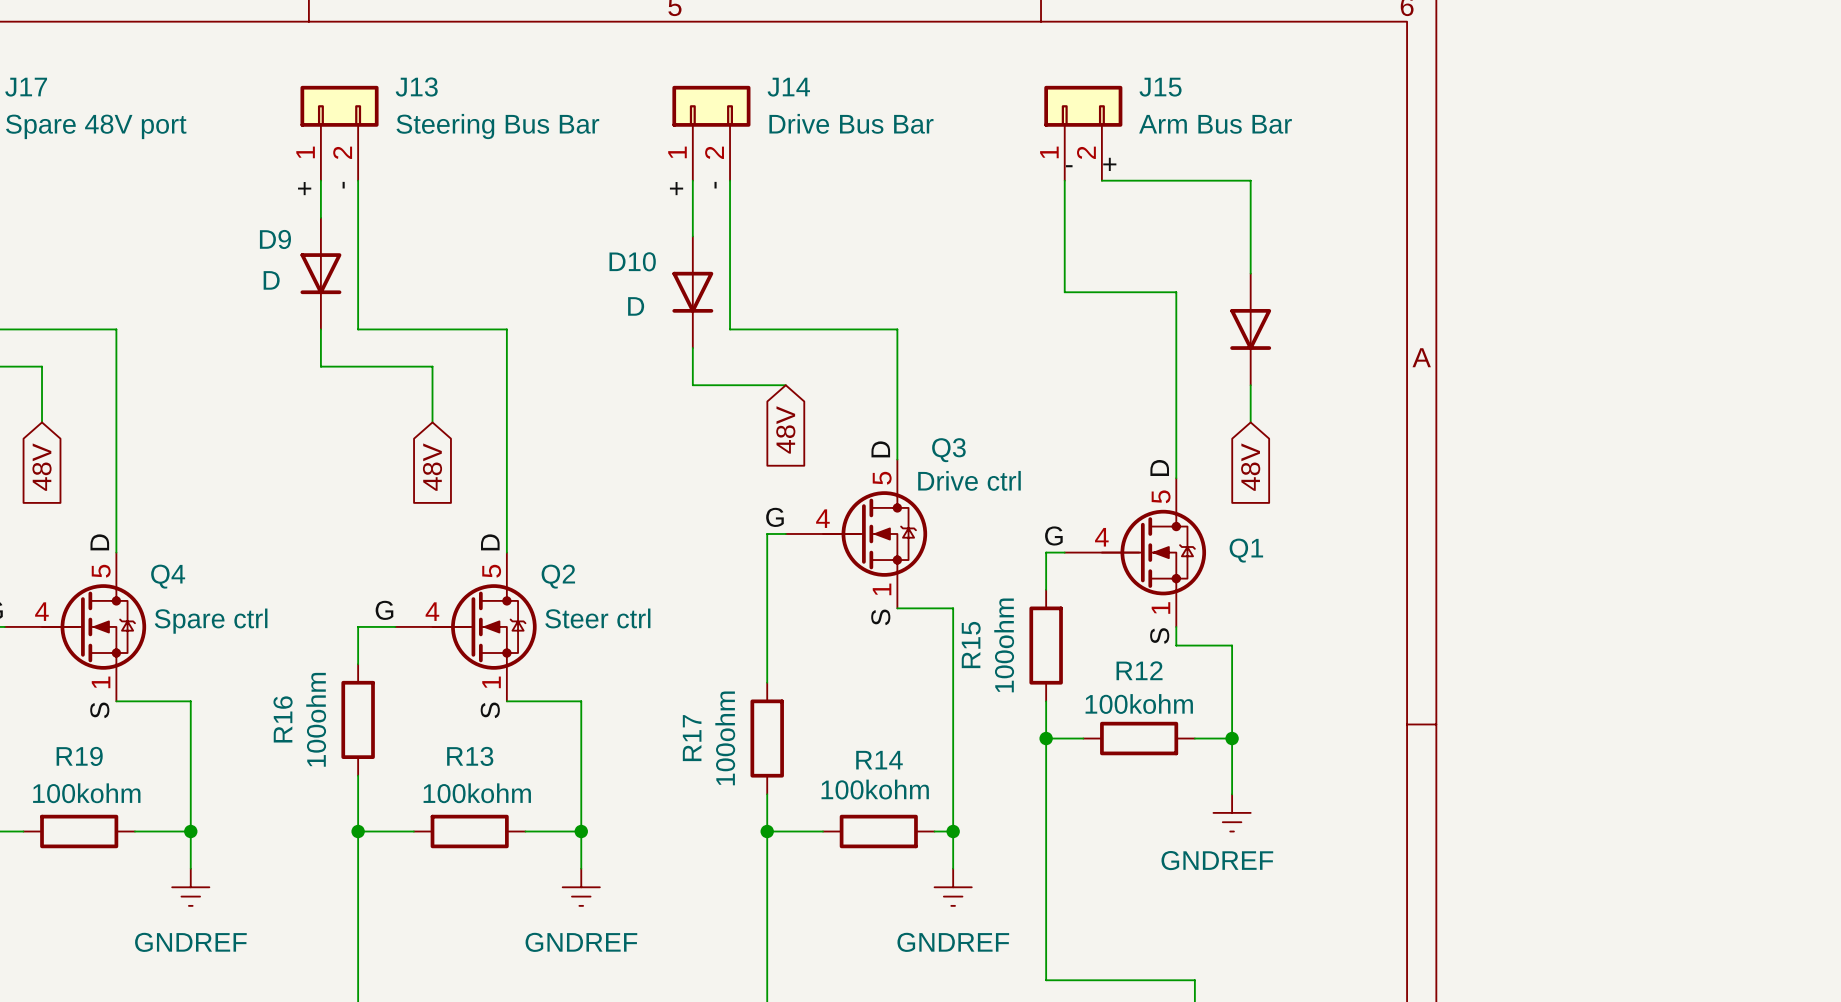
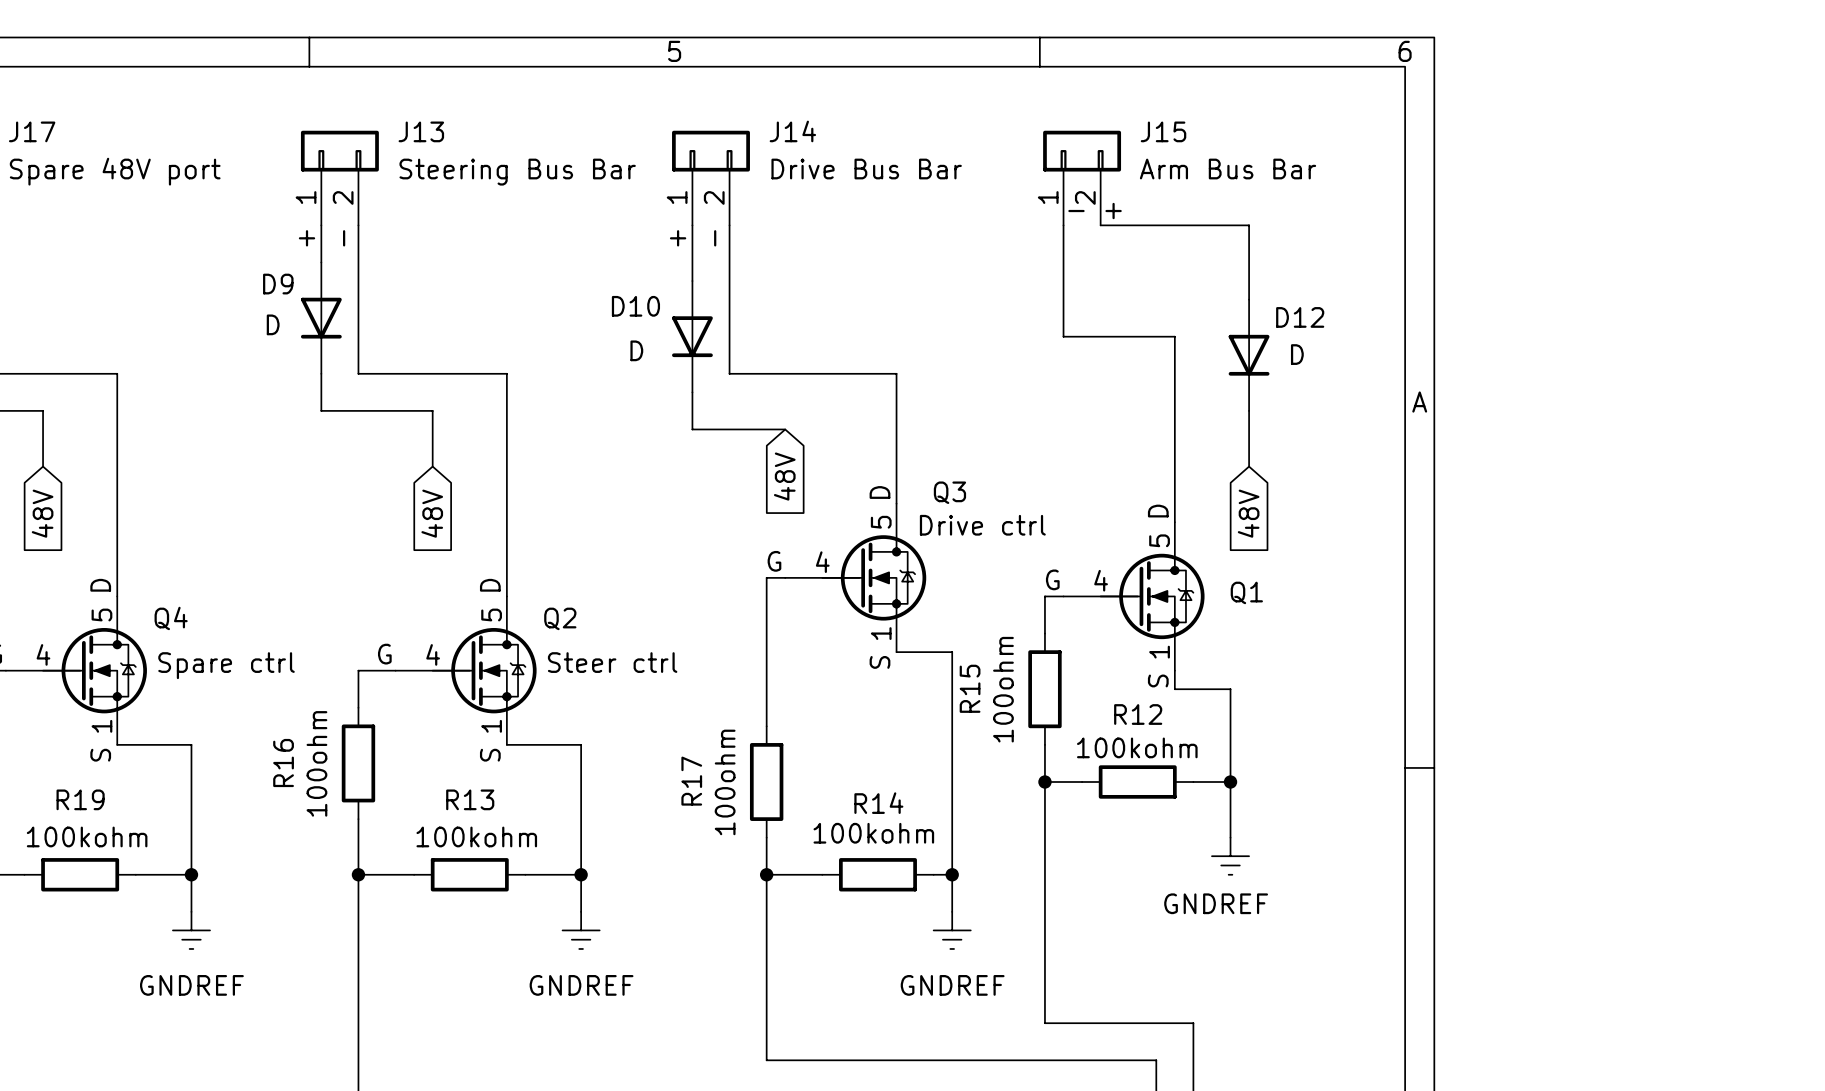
D12: none -> D (1249, 355)
part: (1250, 329) -> none

